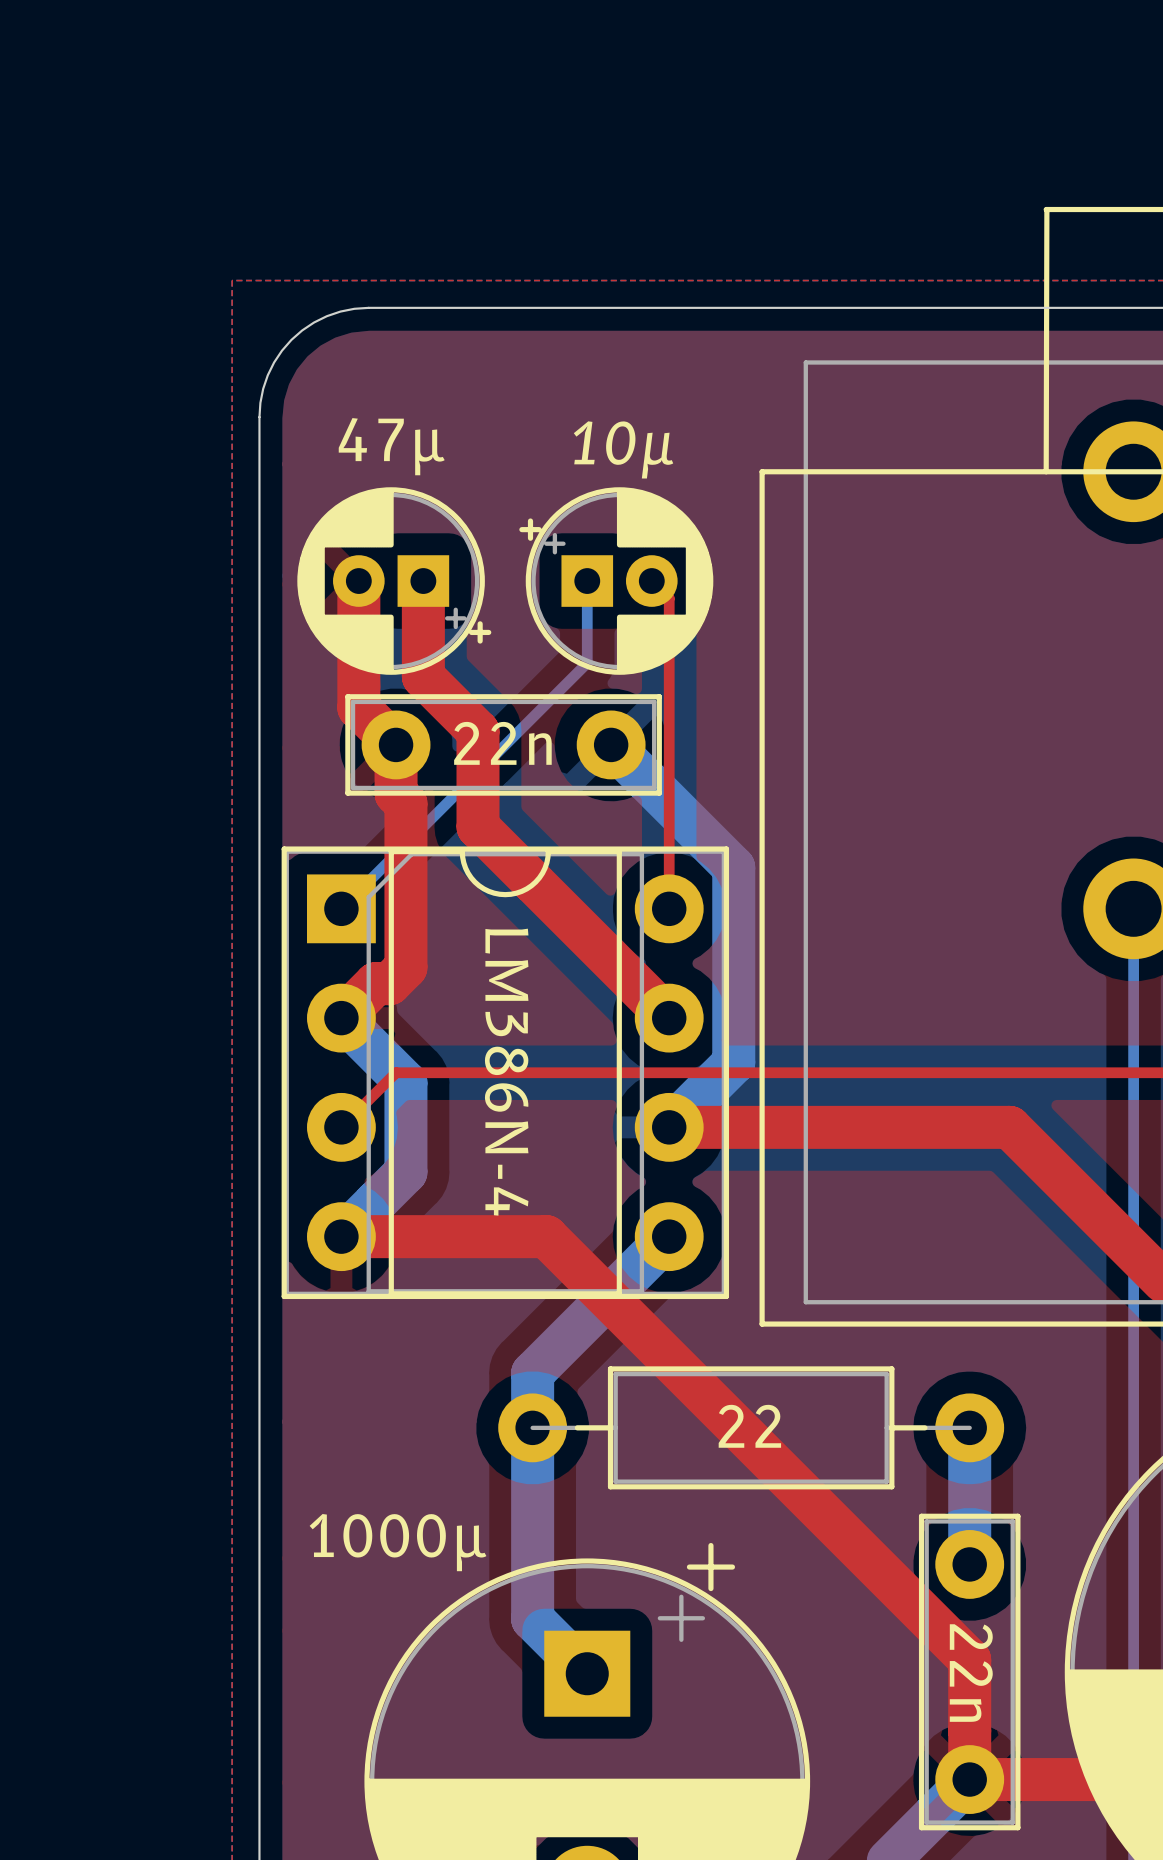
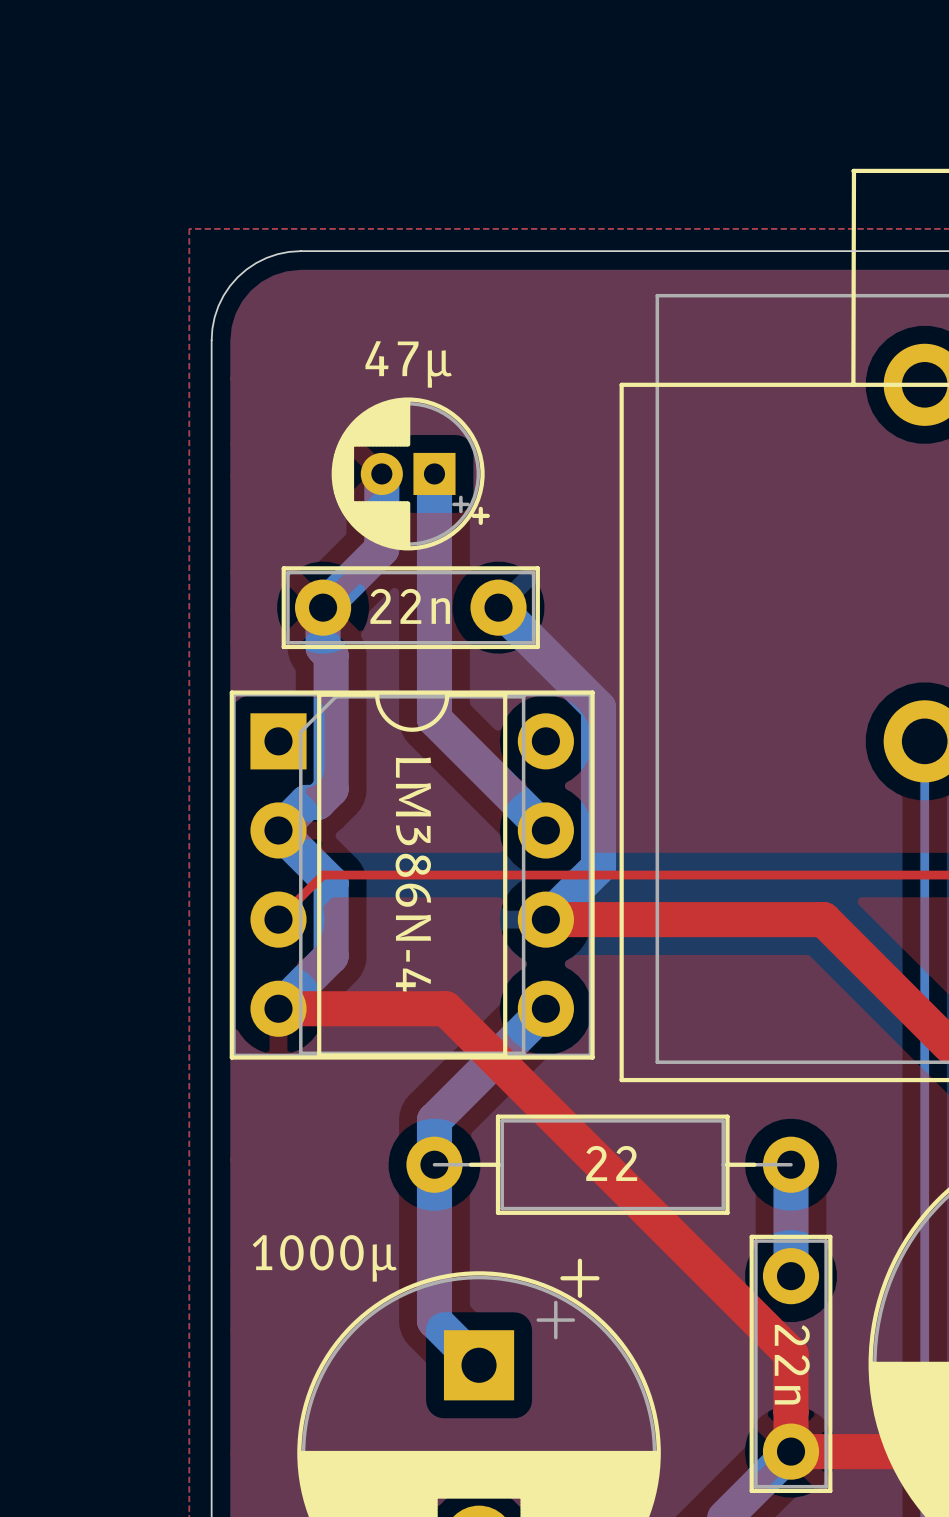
top track: (358, 581) (358, 707) (396, 744) (396, 793) (405, 803) (405, 967) (389, 983) (375, 983) (341, 1018) -> none
part position: (394, 581) -> (410, 473)
top track: (423, 581) (423, 676) (478, 731) (478, 826) (669, 1018) -> none
bottom track: none -> (381, 473) (381, 548) (323, 607) (323, 647) (331, 655) (331, 789) (317, 802) (306, 802) (278, 830)
bottom track: none -> (434, 473) (434, 719) (545, 830)
bottom track: (587, 581) (587, 662) (341, 908) -> none
part: 10µ (616, 581) -> none
top track: (651, 581) (669, 598) (669, 908) -> none

